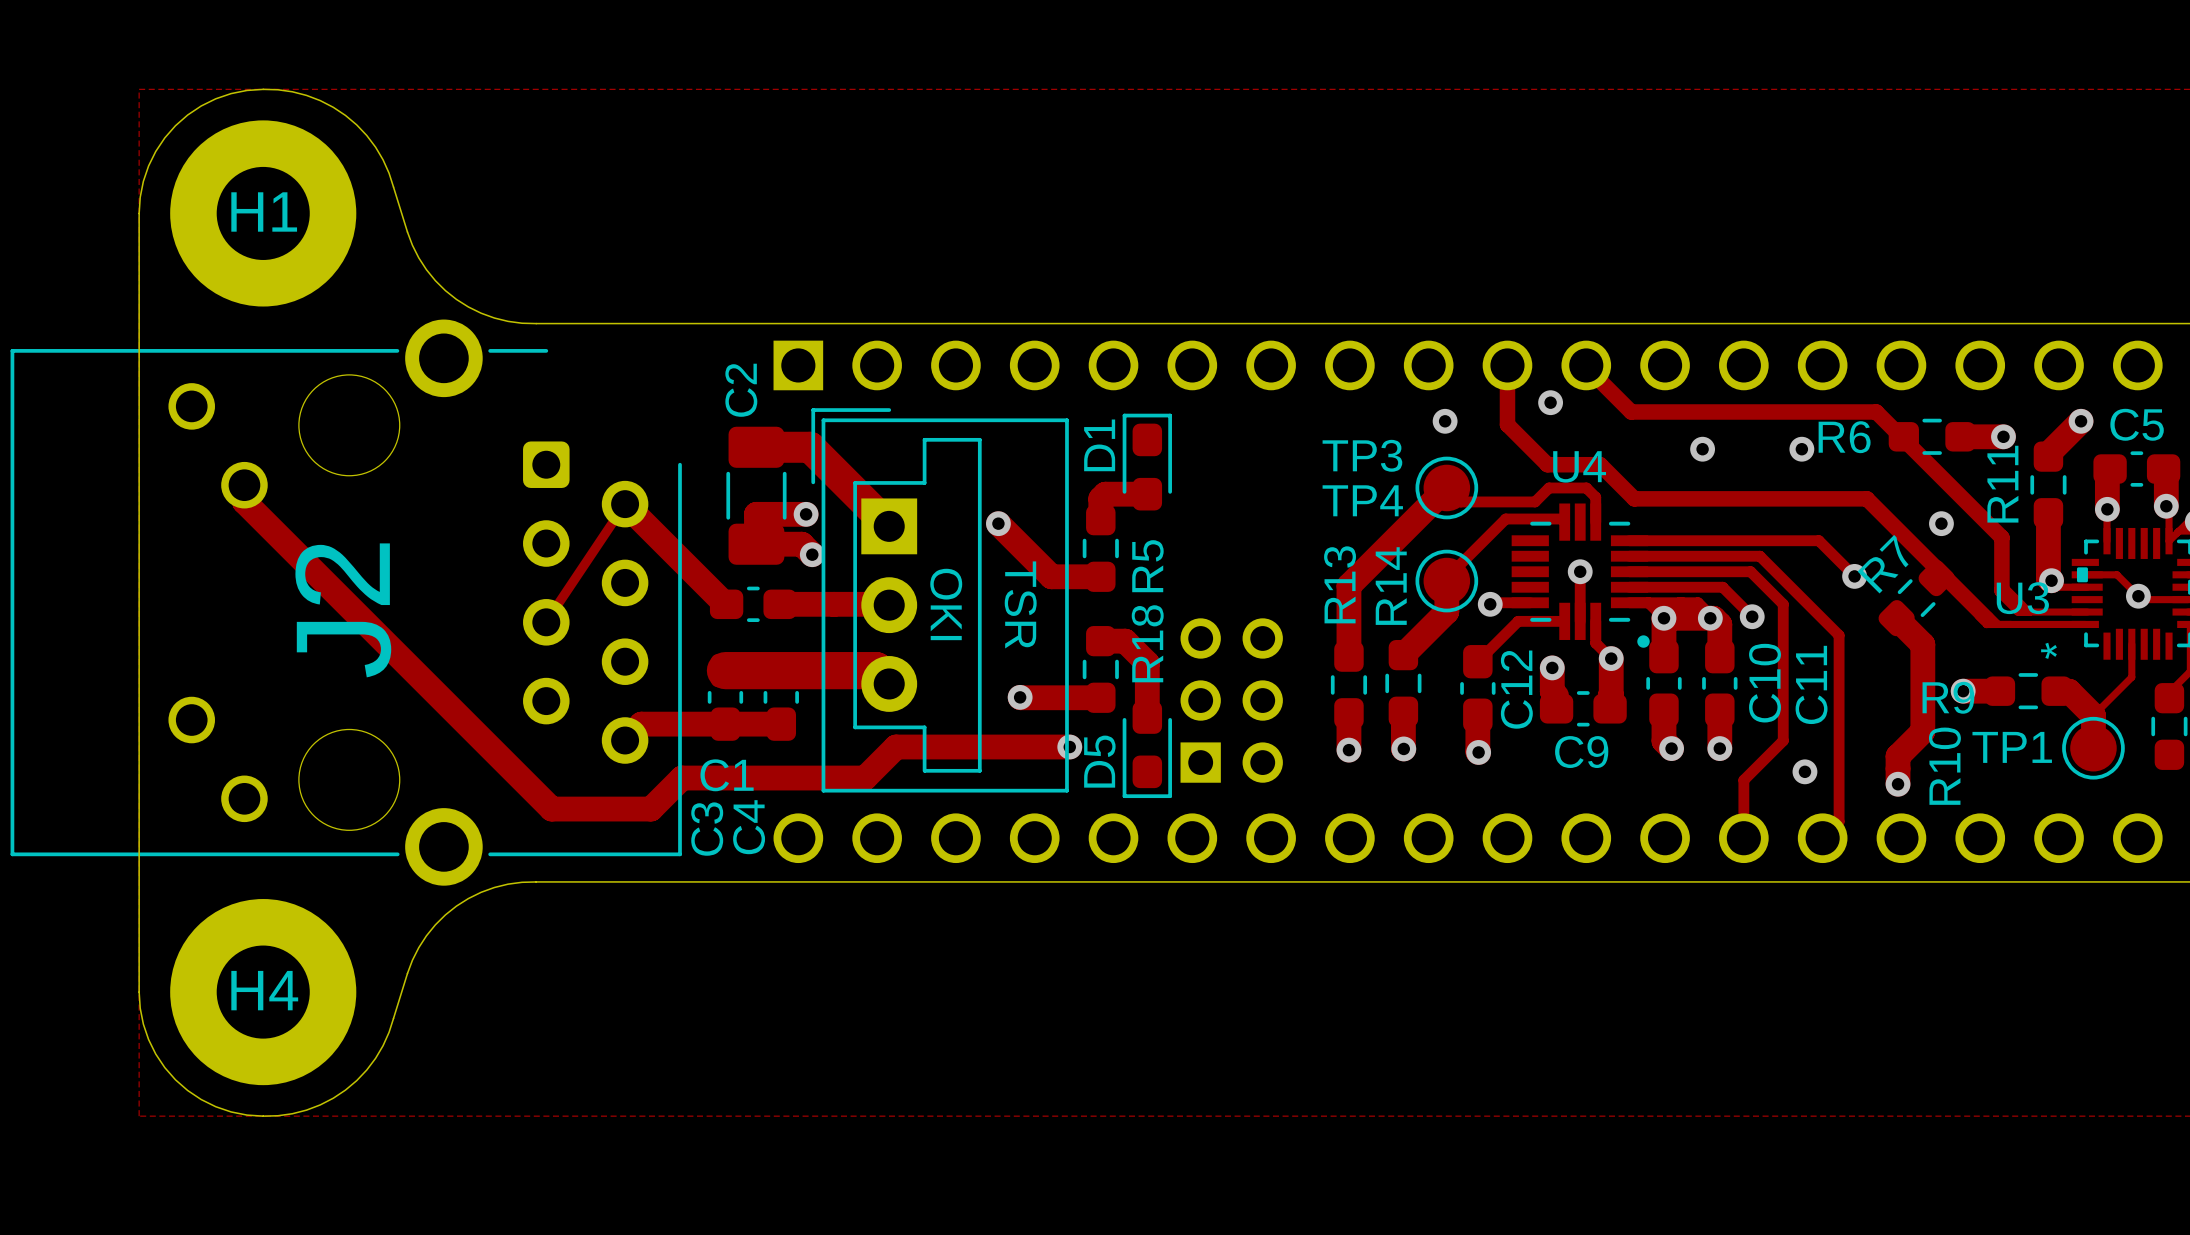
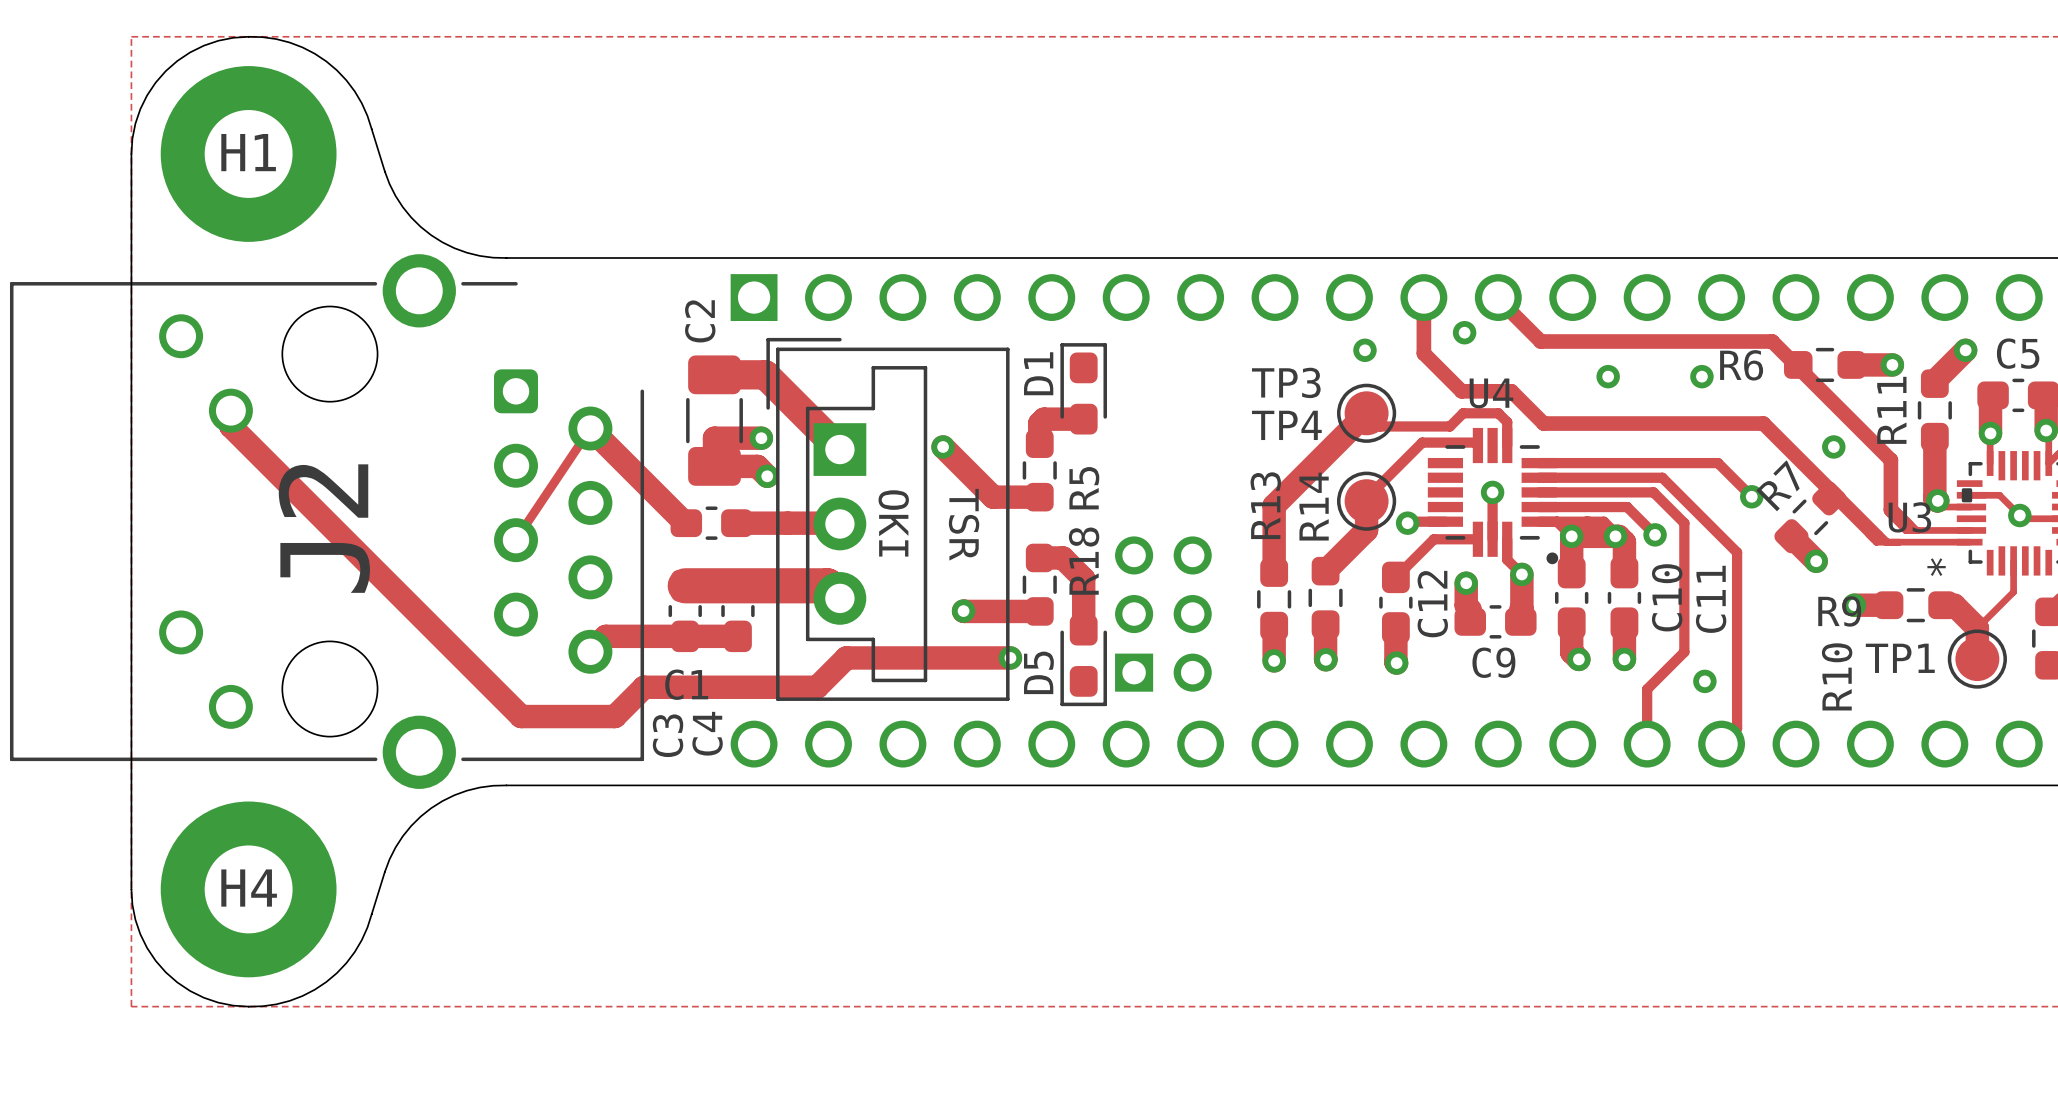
track: (1922, 644) (1922, 731) (1898, 756) (1898, 784) -> none
via position: (1898, 784) -> (1816, 561)

